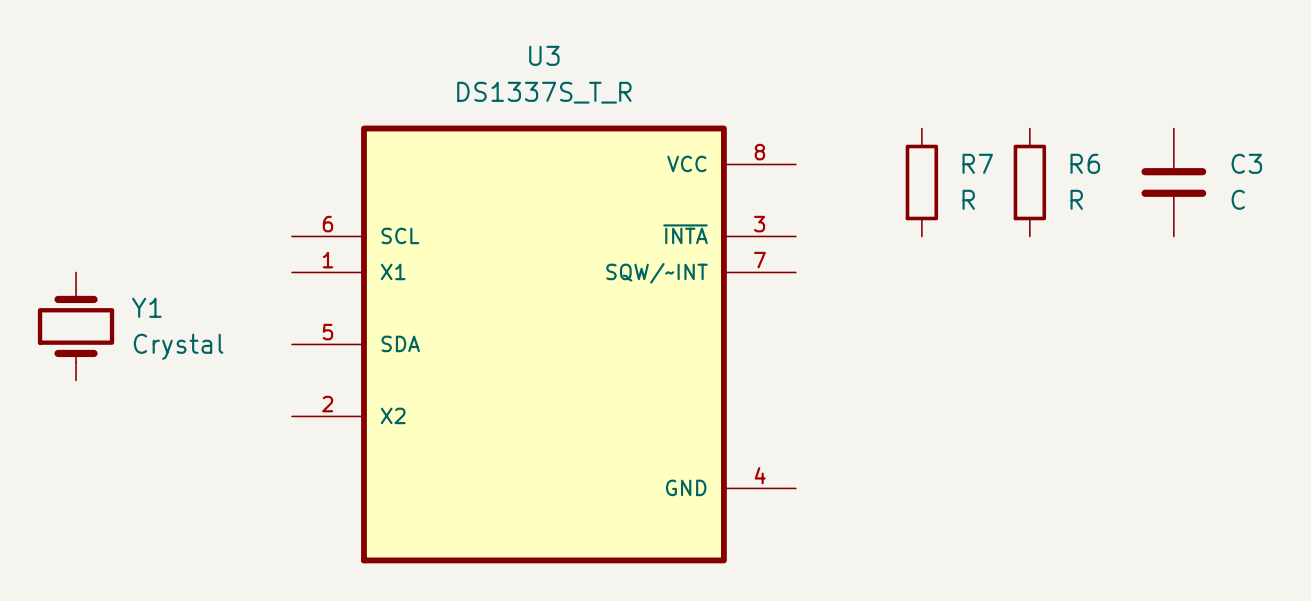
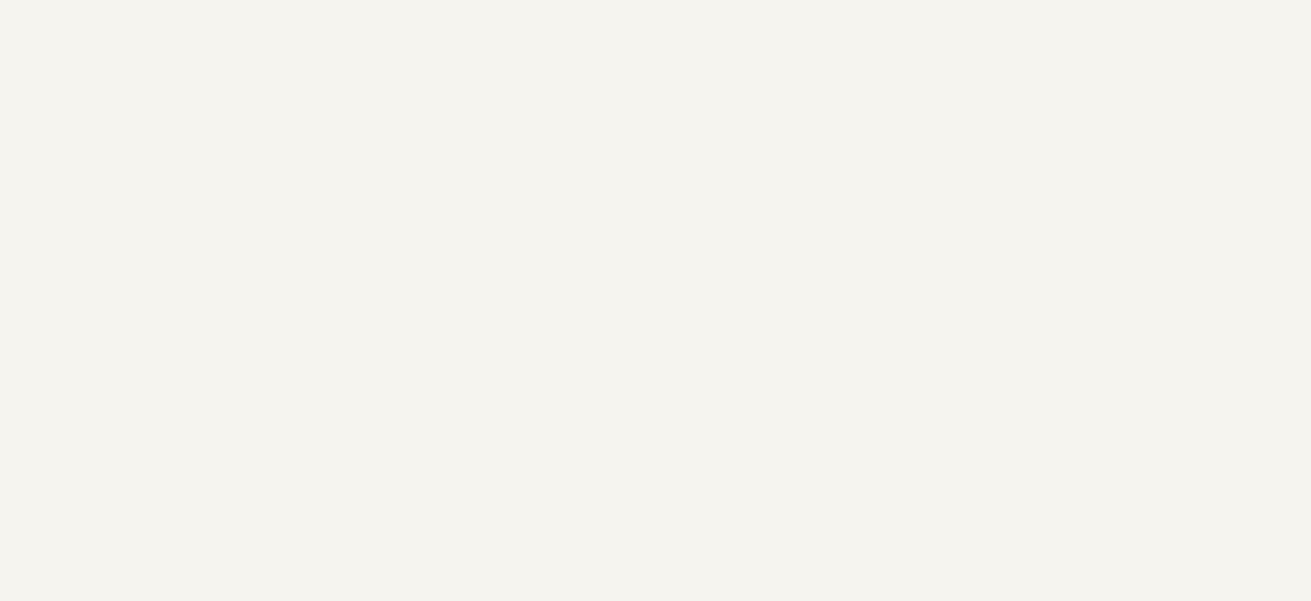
R7: R (921, 182) -> none
R6: R (1029, 182) -> none
C3: C (1173, 182) -> none
Y1: Crystal (76, 326) -> none
U3: DS1337S_T_R (543, 344) -> none

